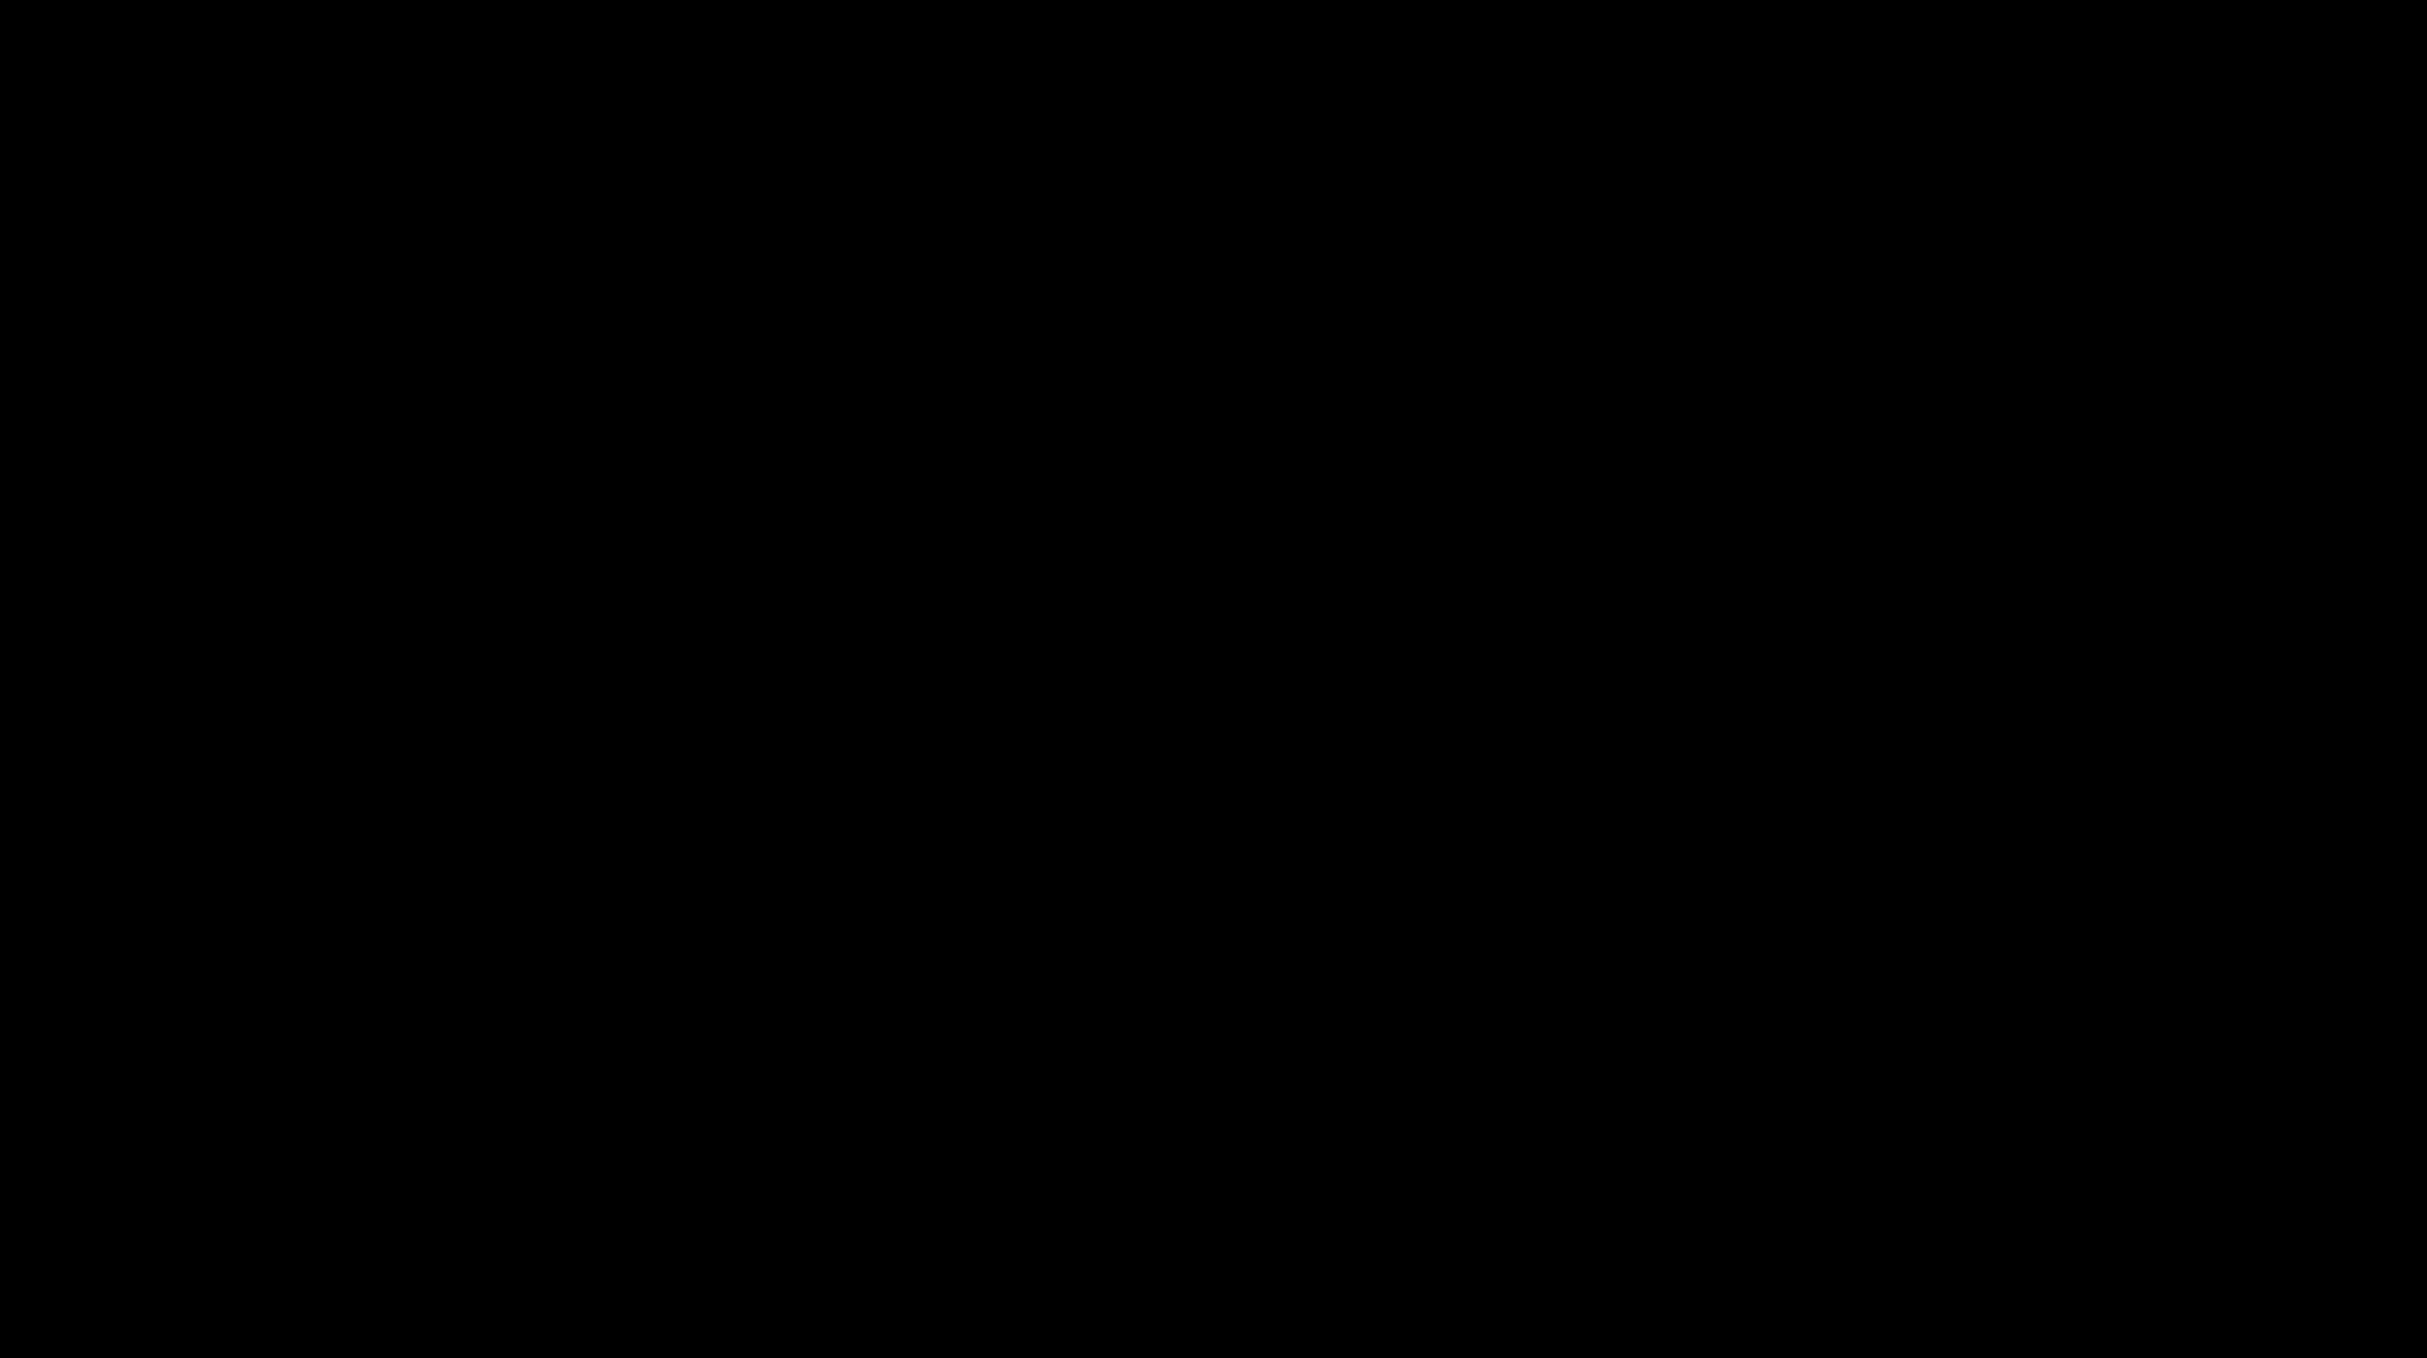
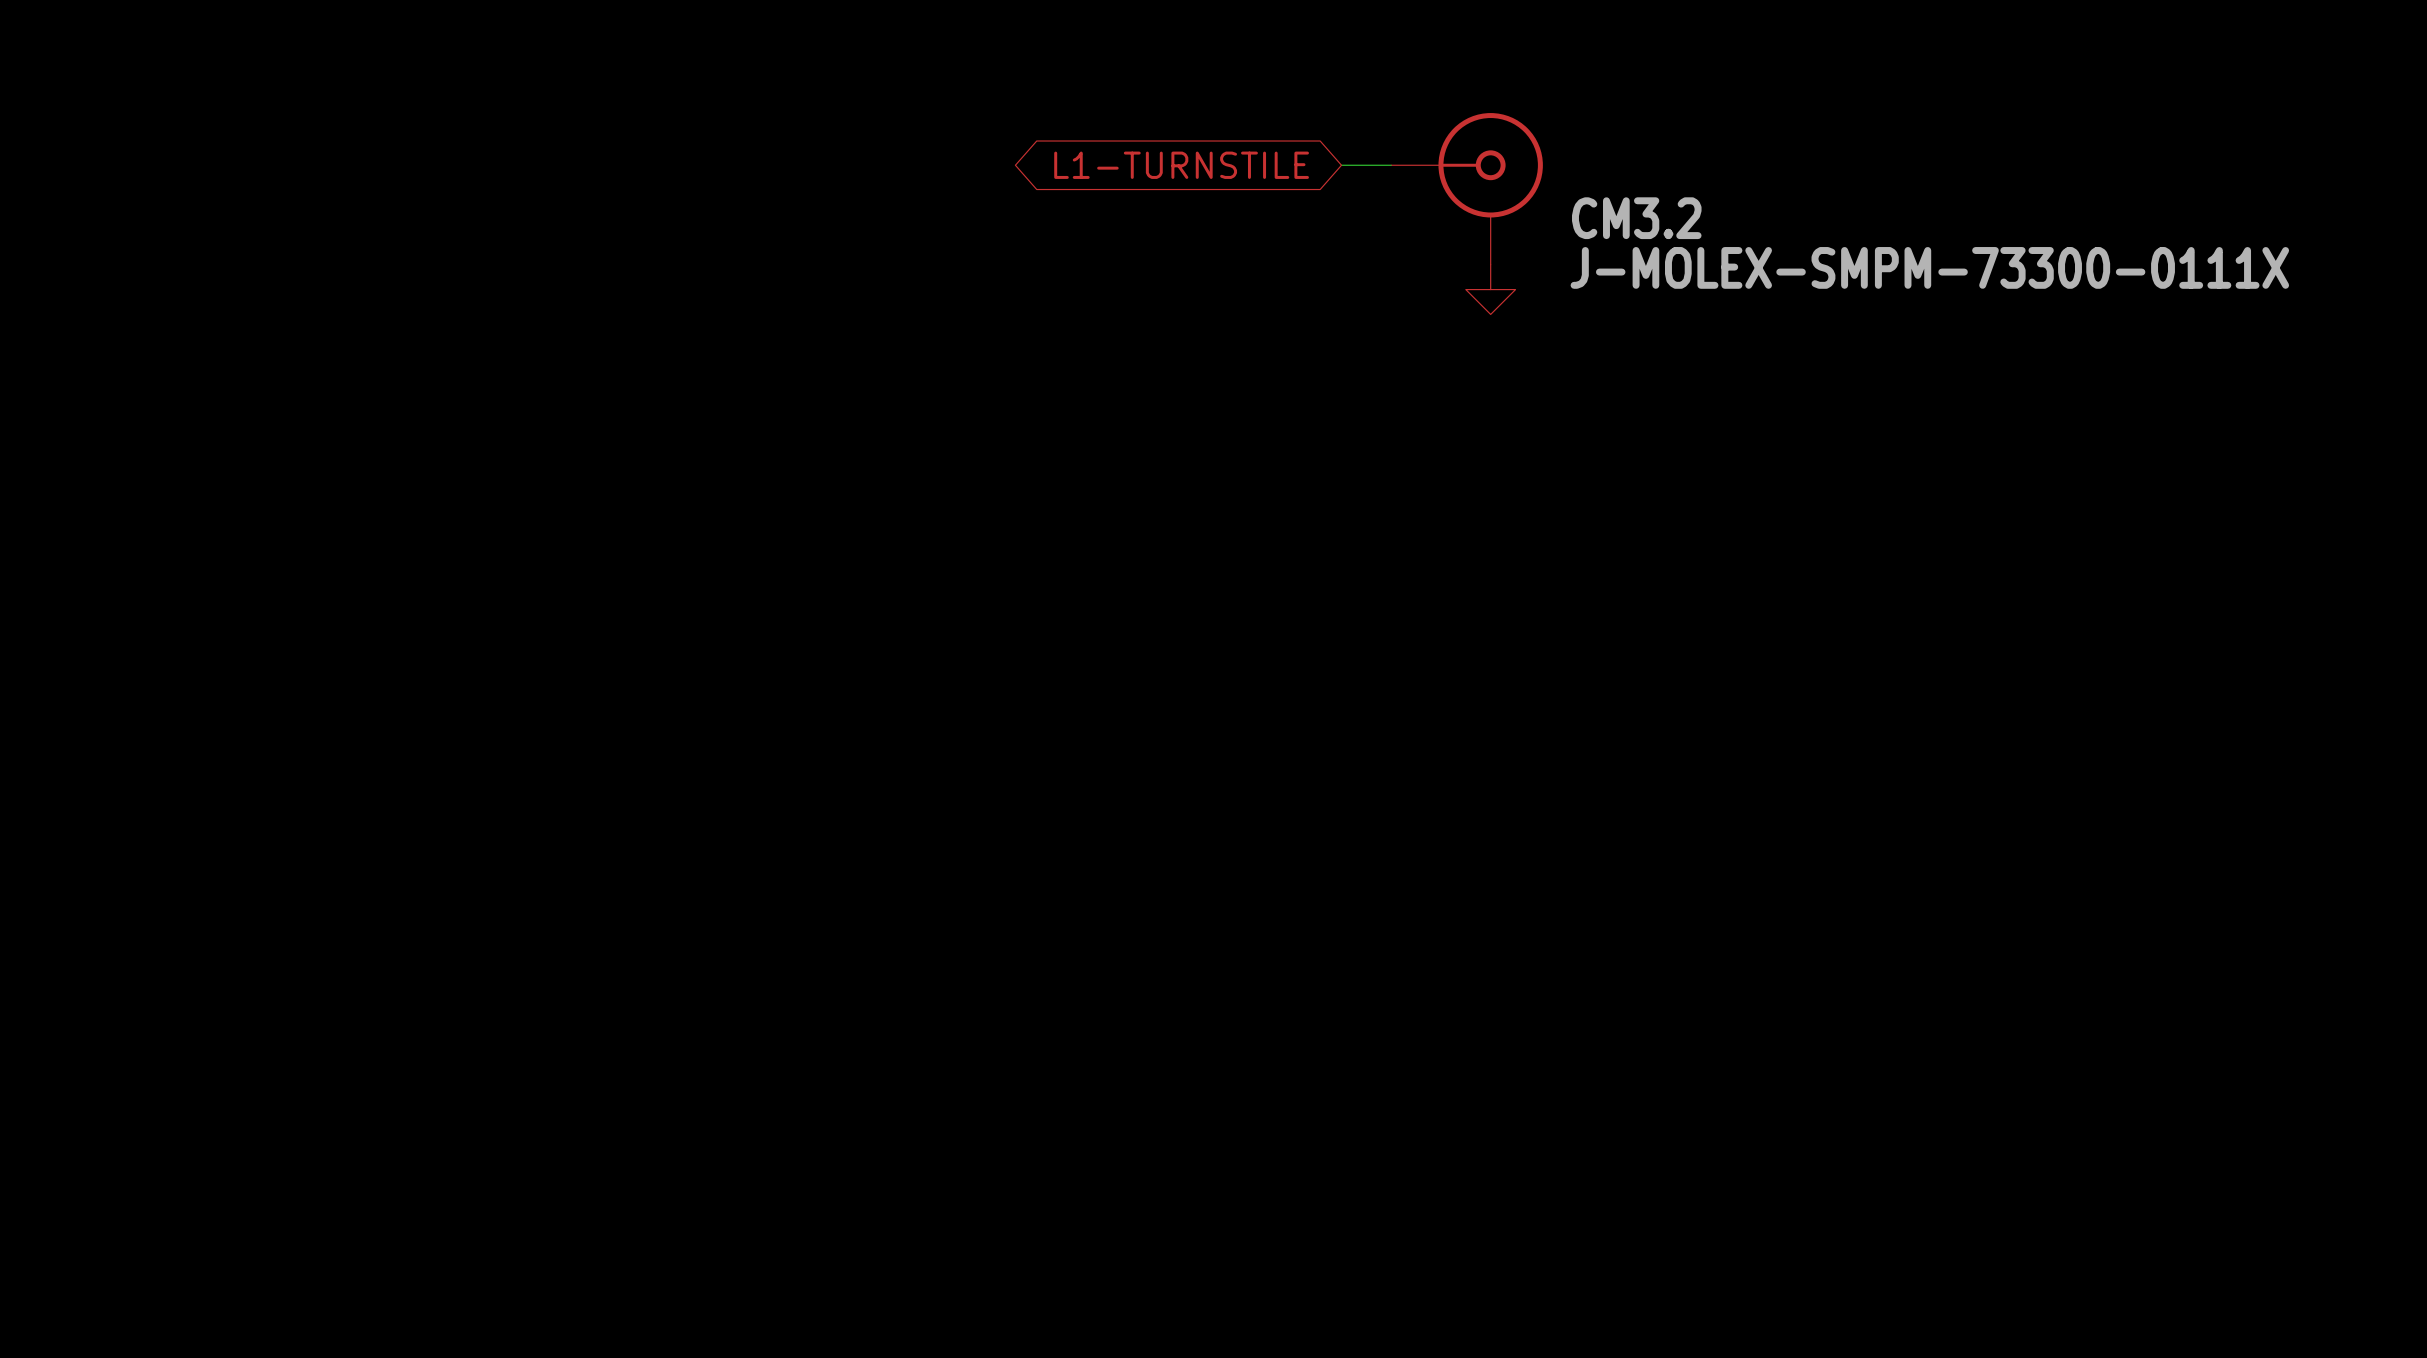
global label: none -> L1-TURNSTILE (1181, 165)
wire: none -> (1341, 165) (1391, 165)
CM3.2: none -> J-MOLEX-SMPM-73300-0111X (1467, 188)
power symbol: none -> (1490, 289)

